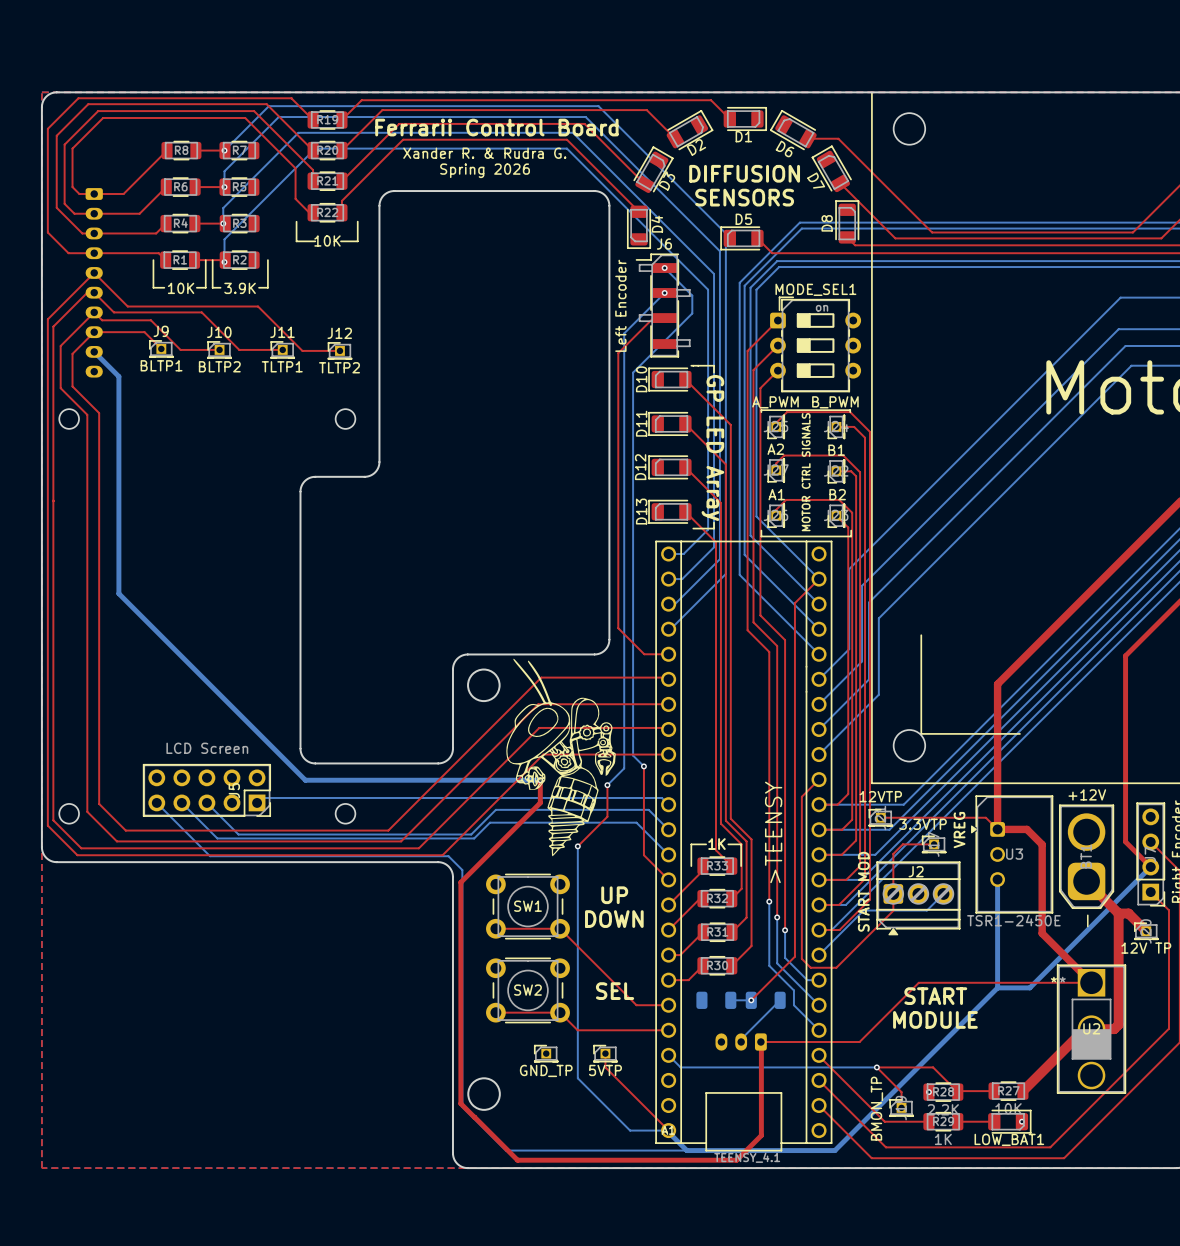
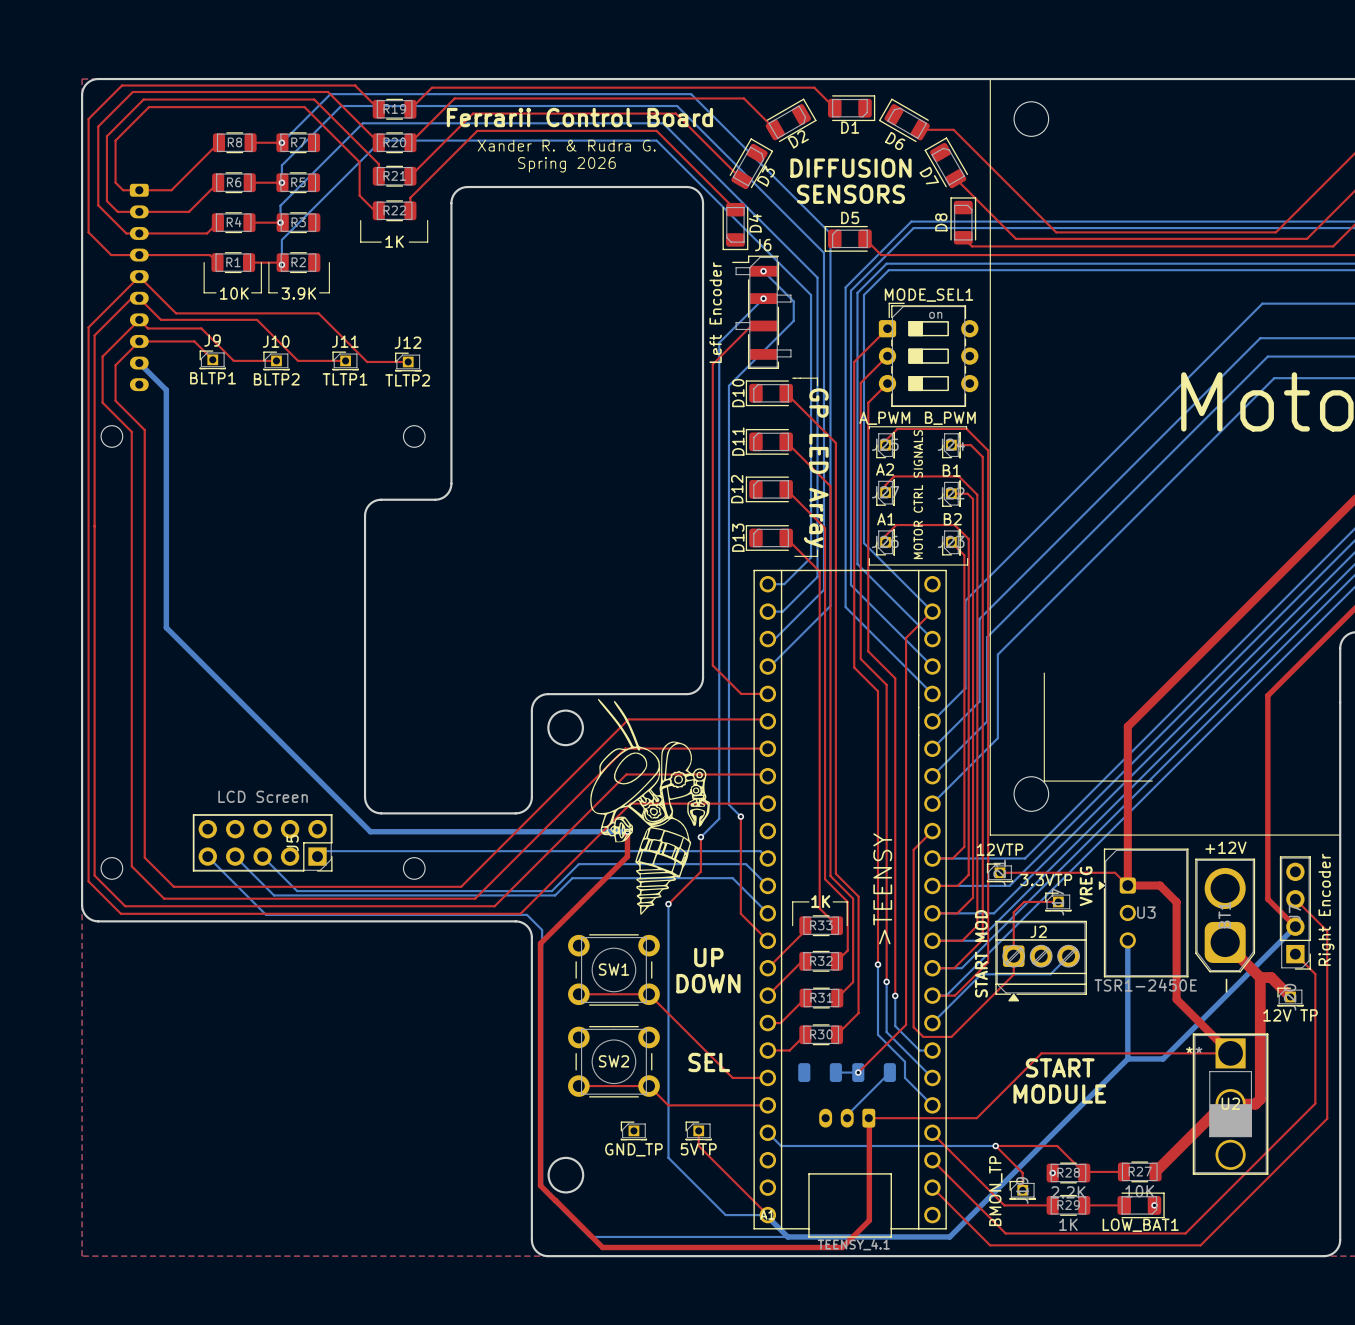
R22 value: 10K (327, 241) -> 1K (394, 241)

